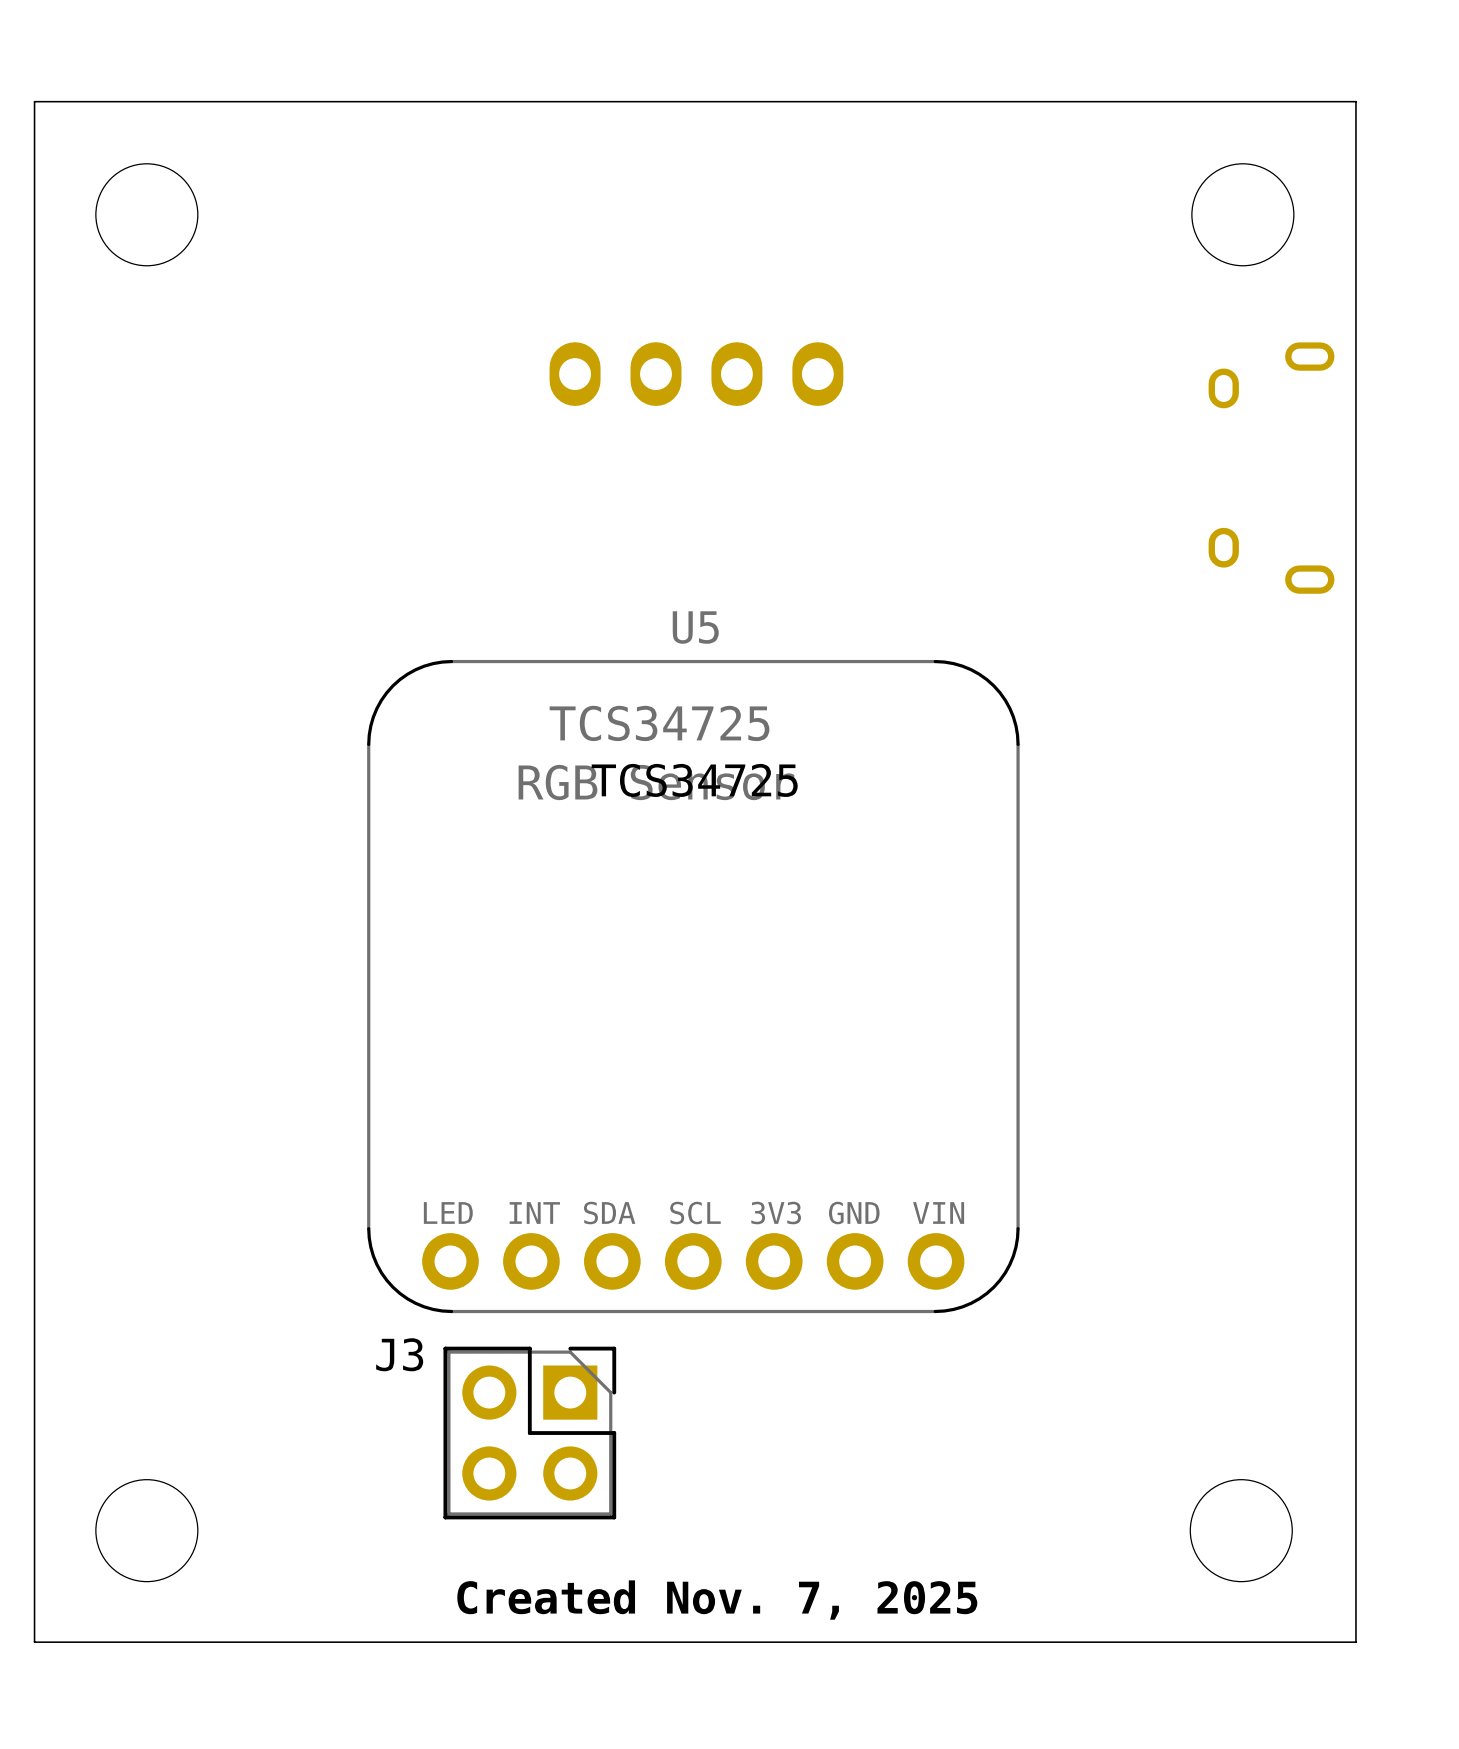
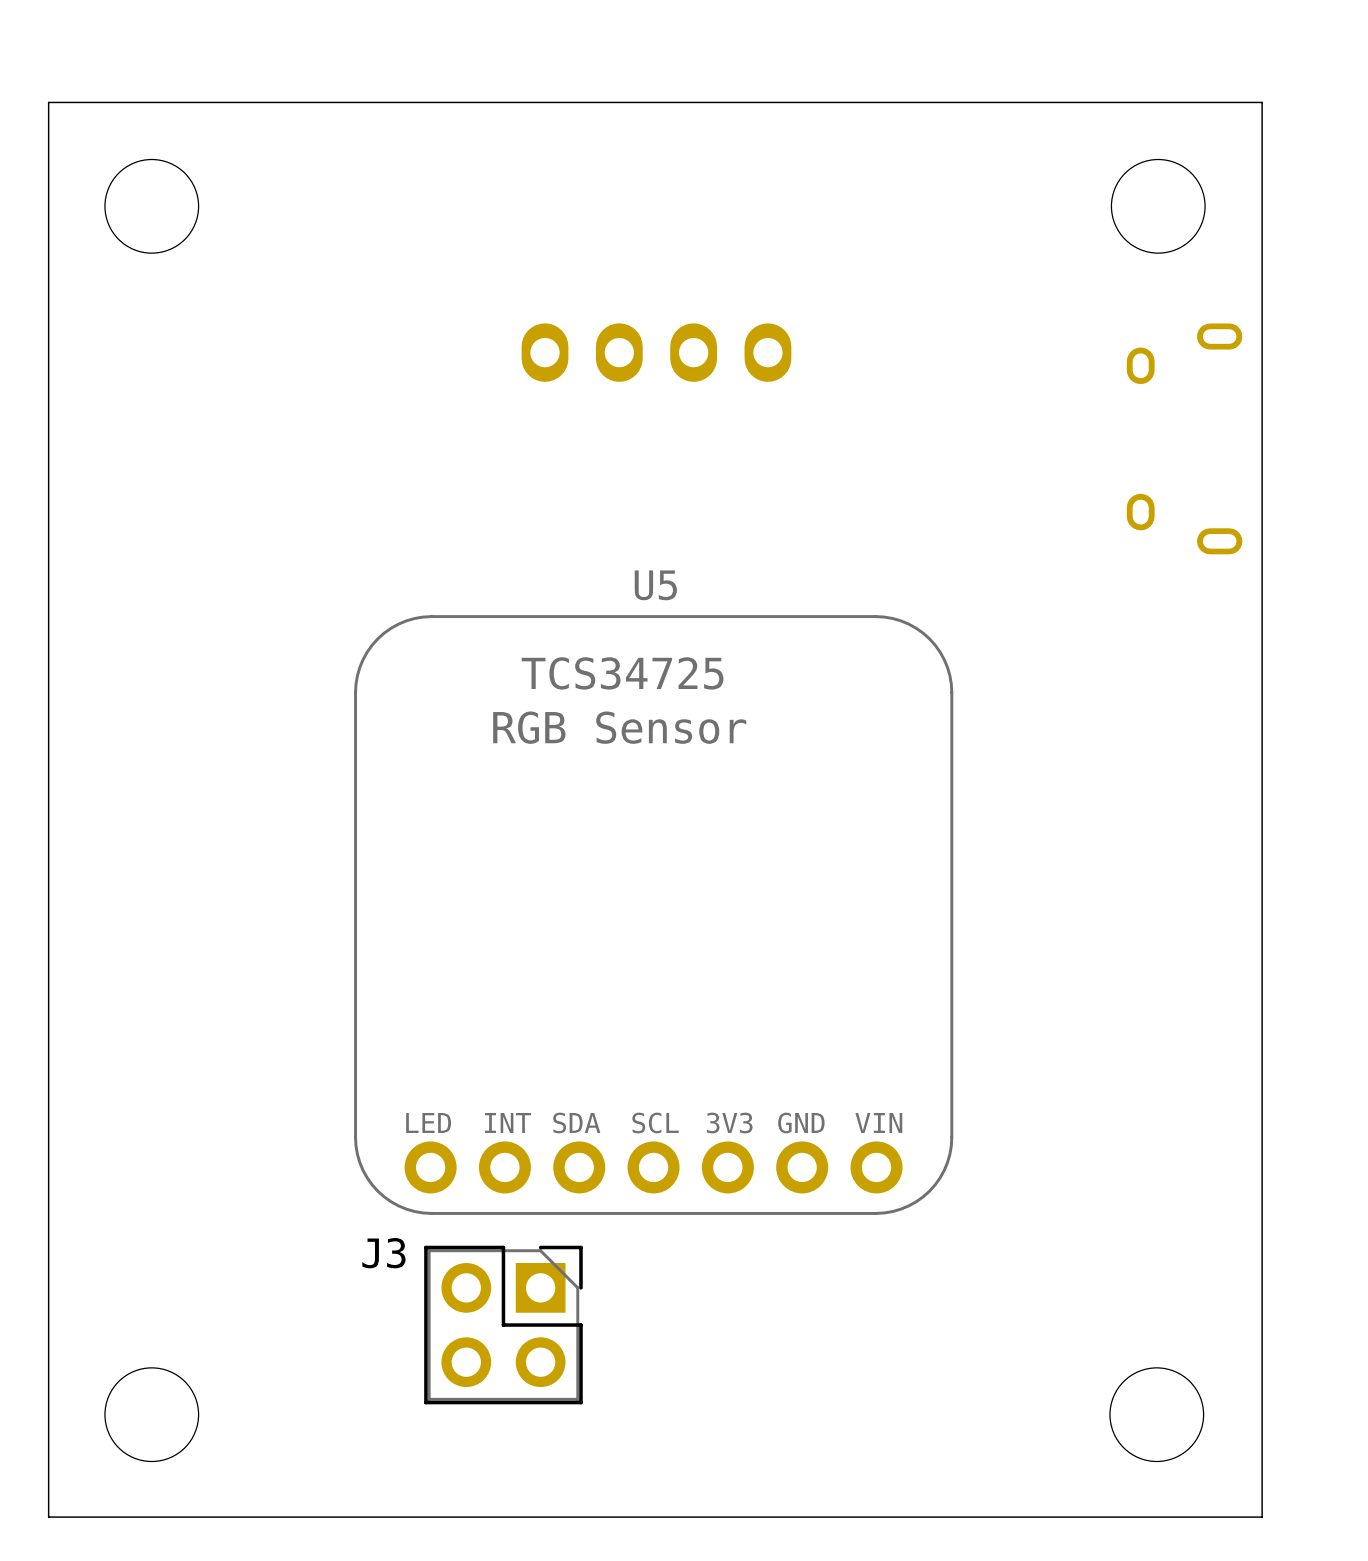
U5 footprint: [367, 659, 1020, 1314] -> [354, 615, 954, 1215]
text: TCS34725 (694, 780) -> none
text: Created Nov. 7, 2025 (717, 1600) -> none

